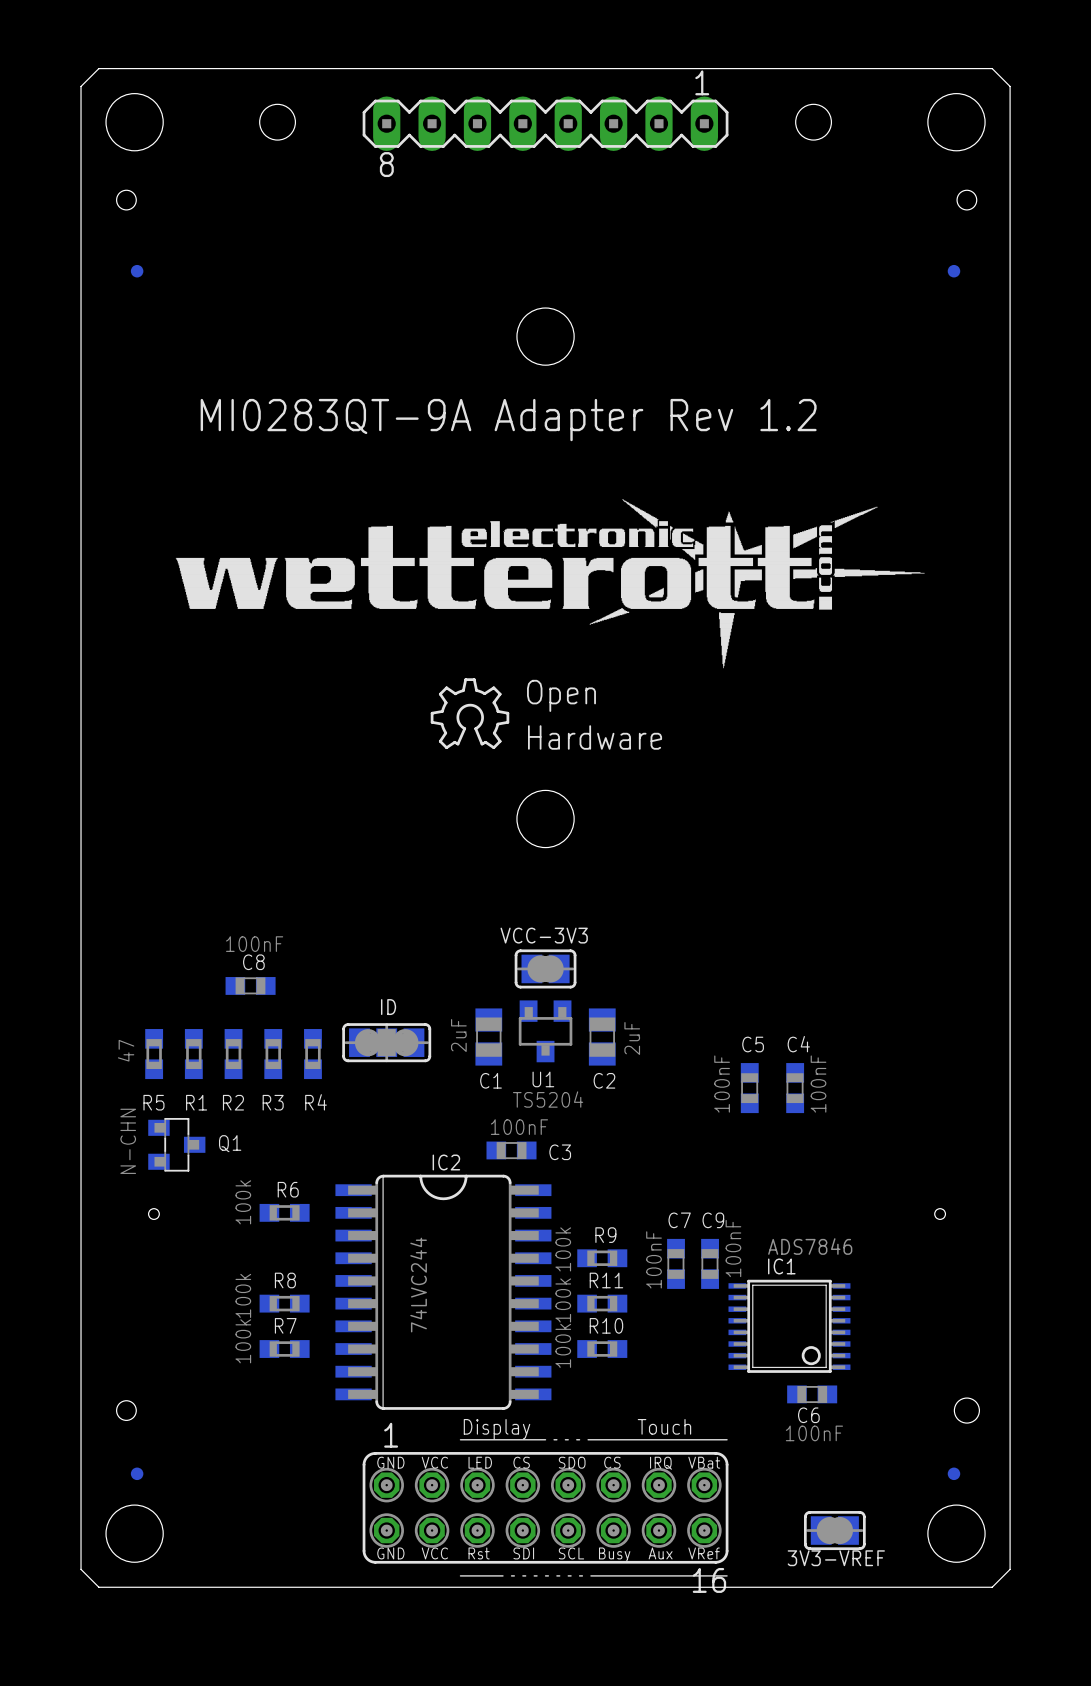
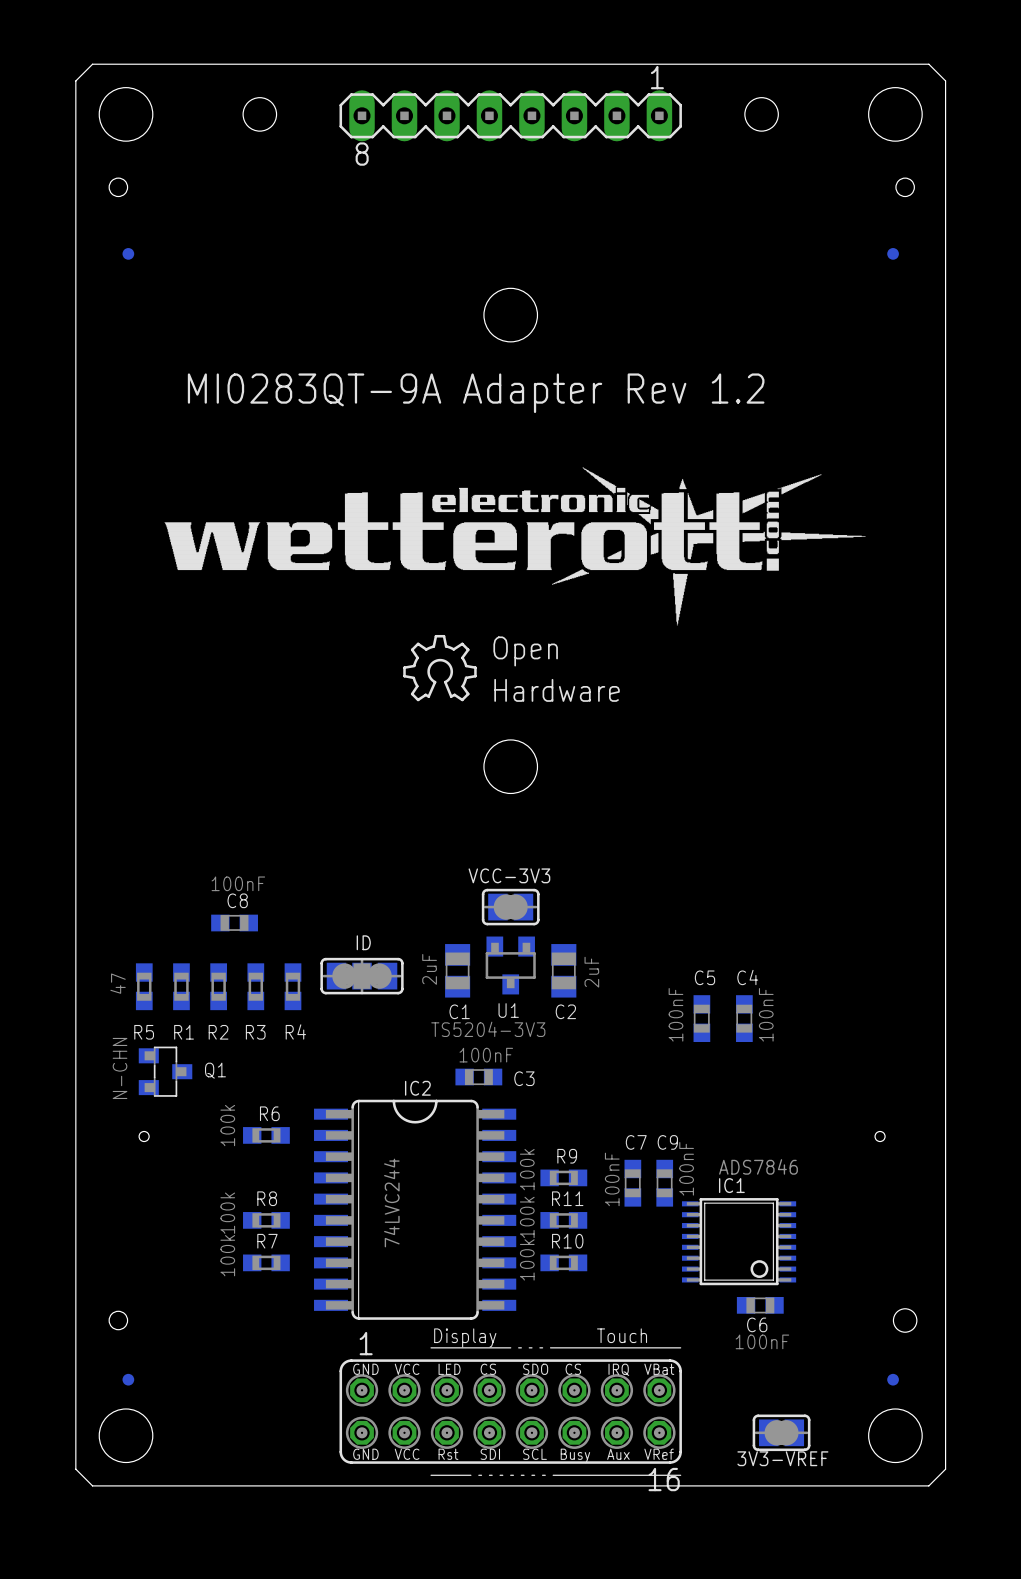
U1 value: TS5204 (548, 1099) -> TS5204-3V3 (488, 1029)

